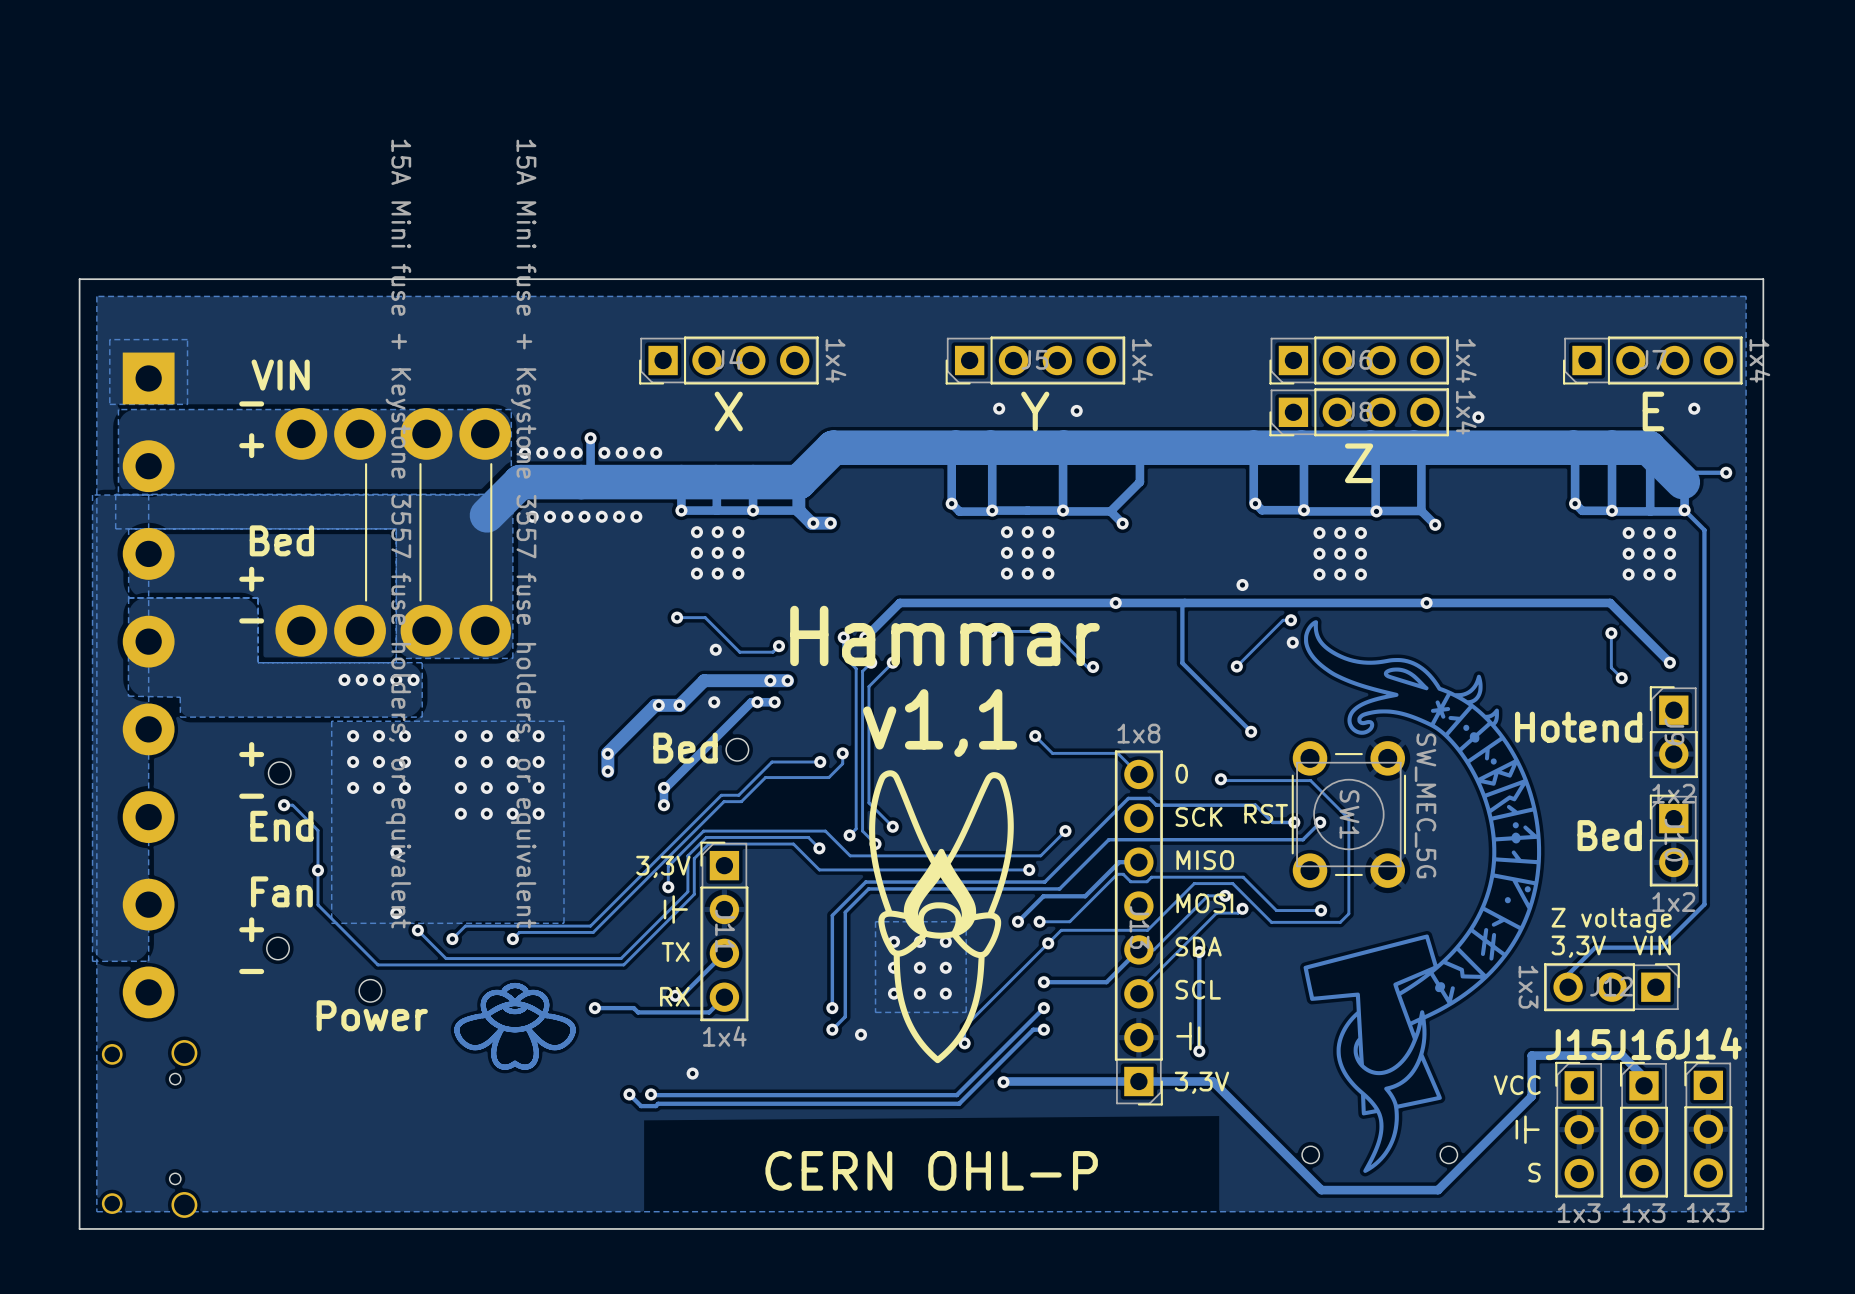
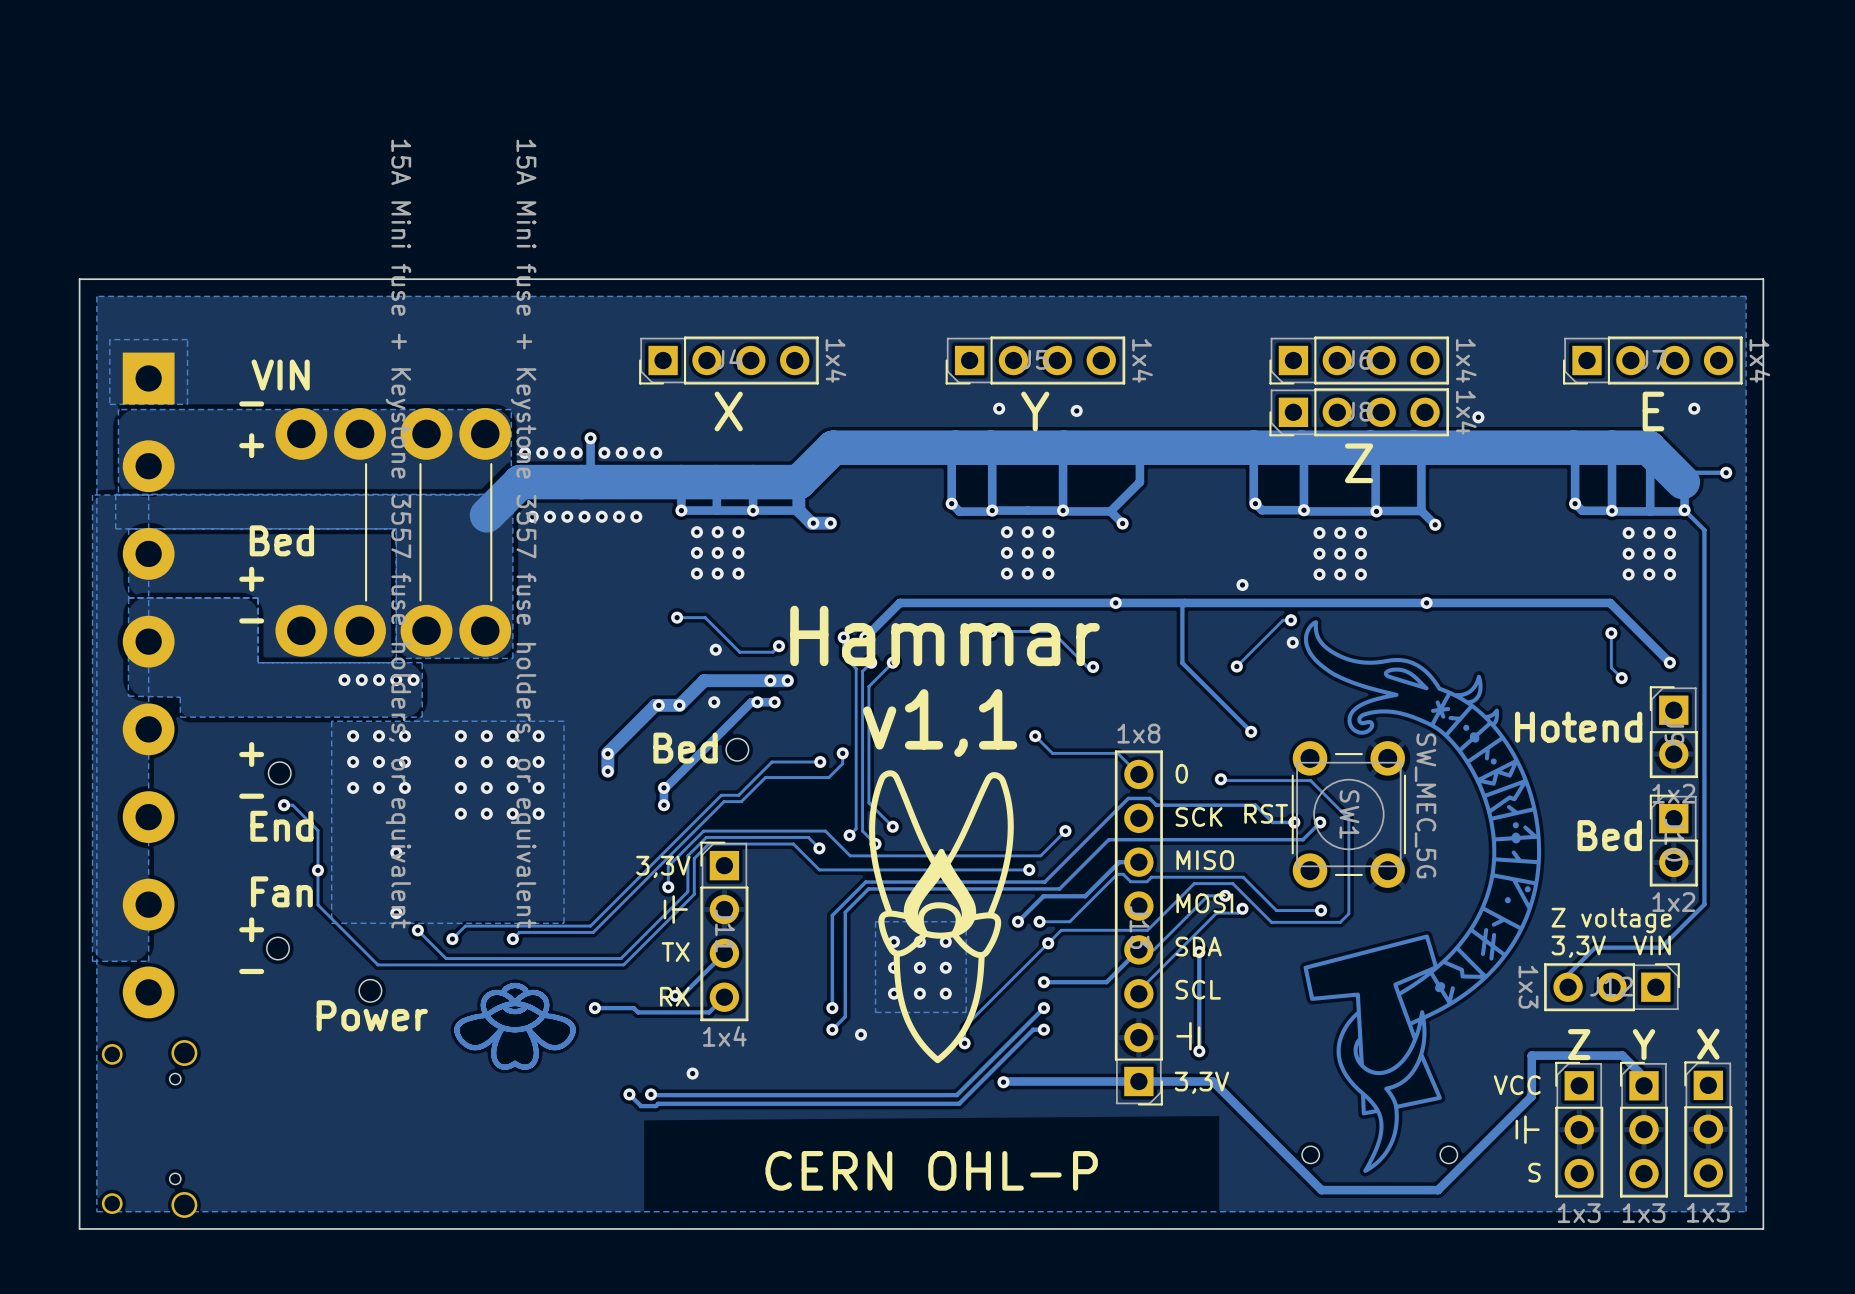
J14 name: J14 (1708, 1043) -> X (1708, 1044)
J15 name: J15 (1578, 1044) -> Z (1579, 1044)
J16 name: J16 (1643, 1044) -> Y (1644, 1044)

